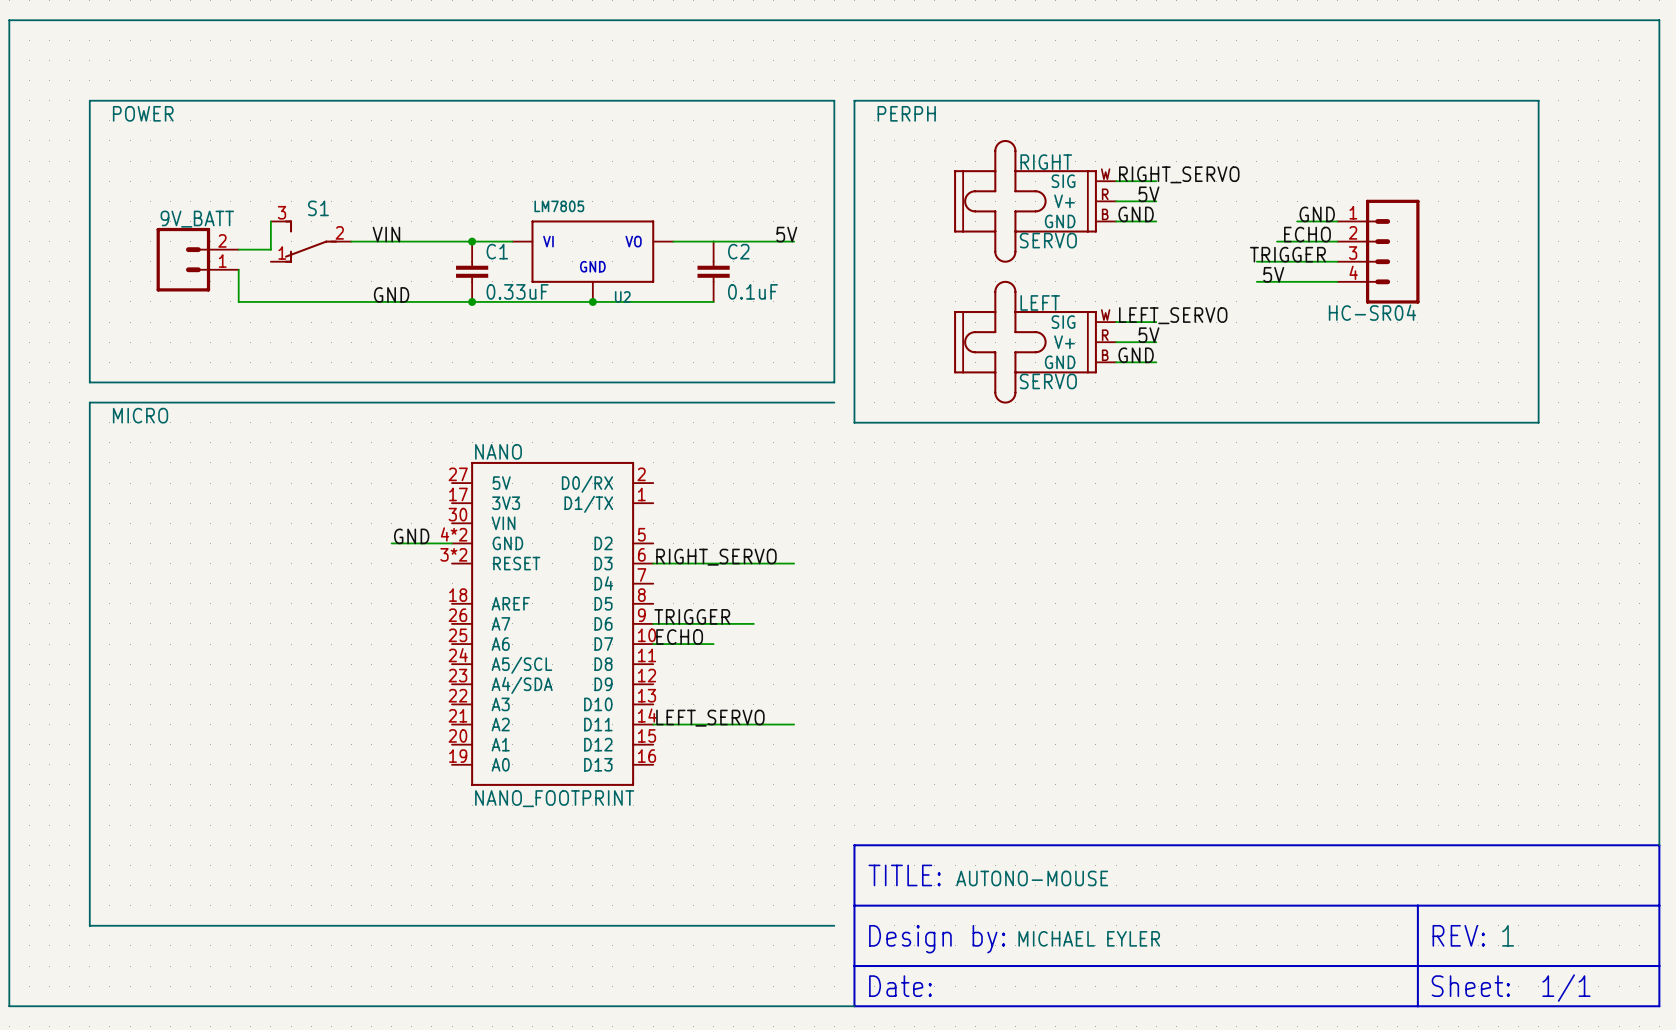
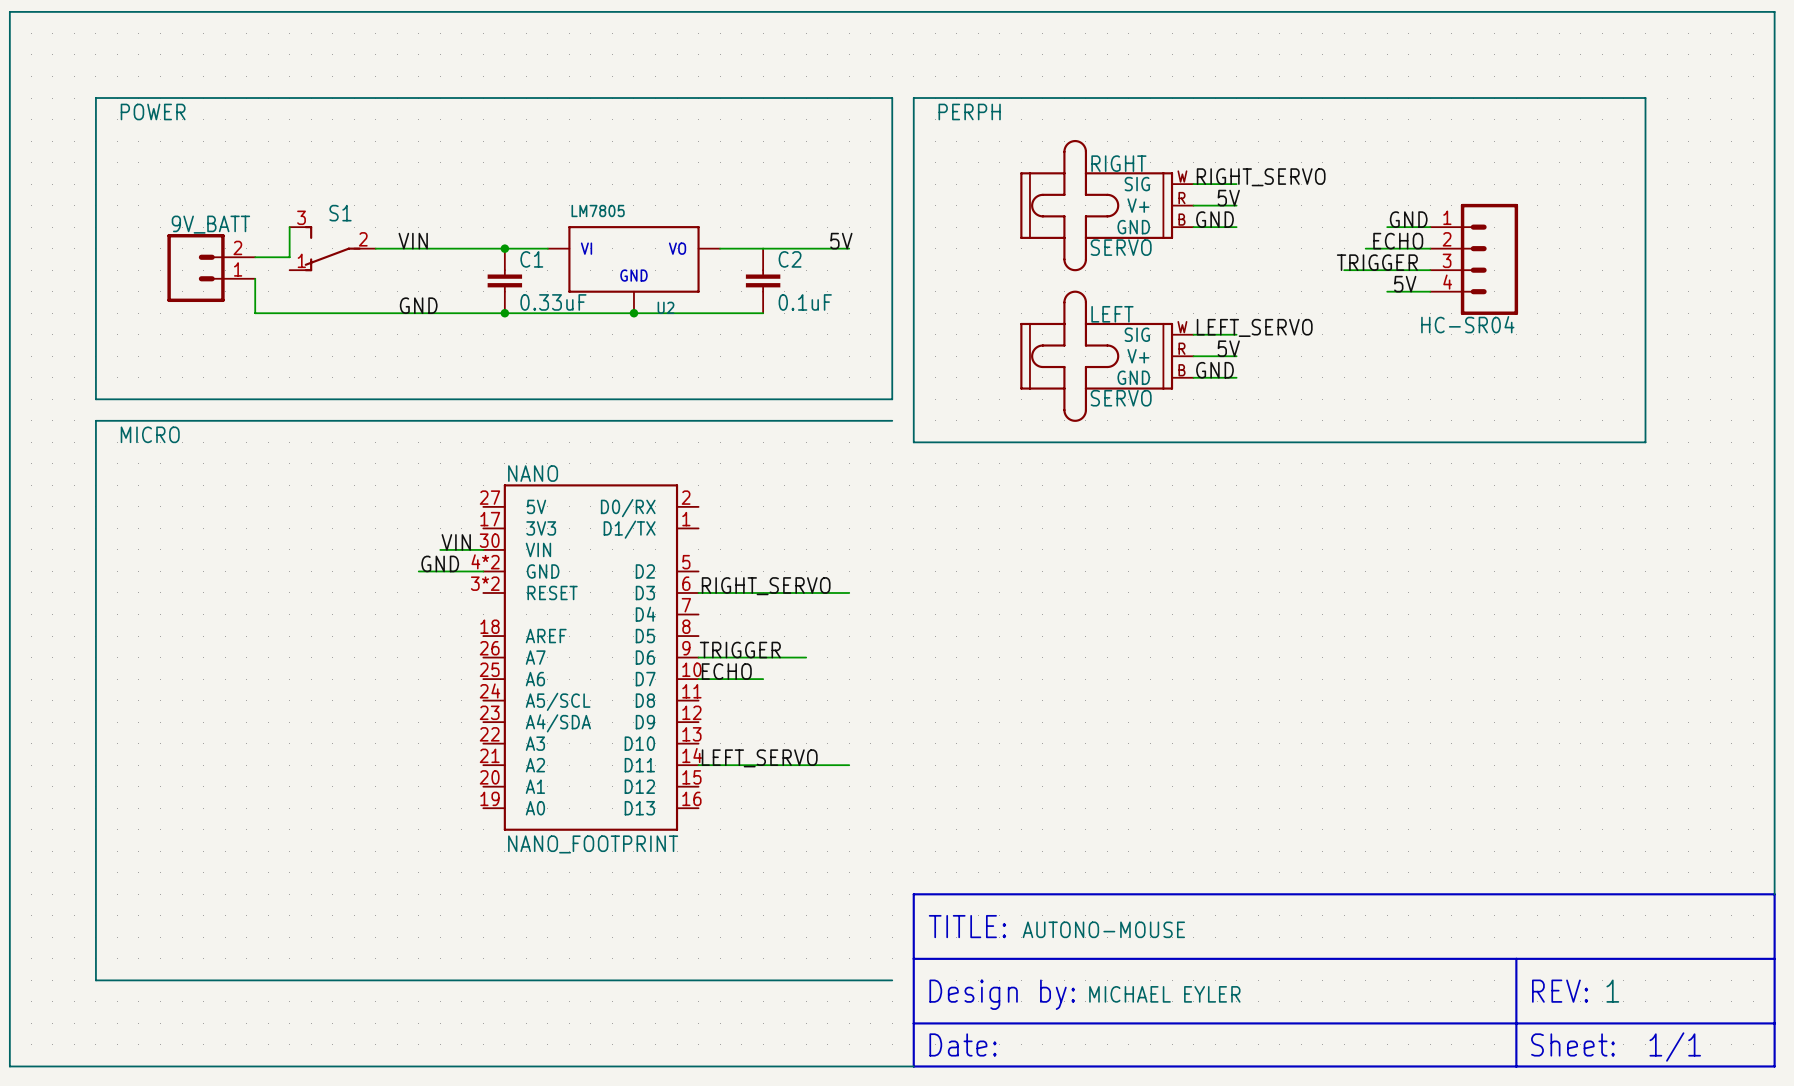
label position: 5V (1273, 274) -> 5V (1405, 284)
wire: (1256, 281) (1297, 281) -> none
label: none -> VIN (456, 542)
wire: none -> (440, 549) (483, 549)

